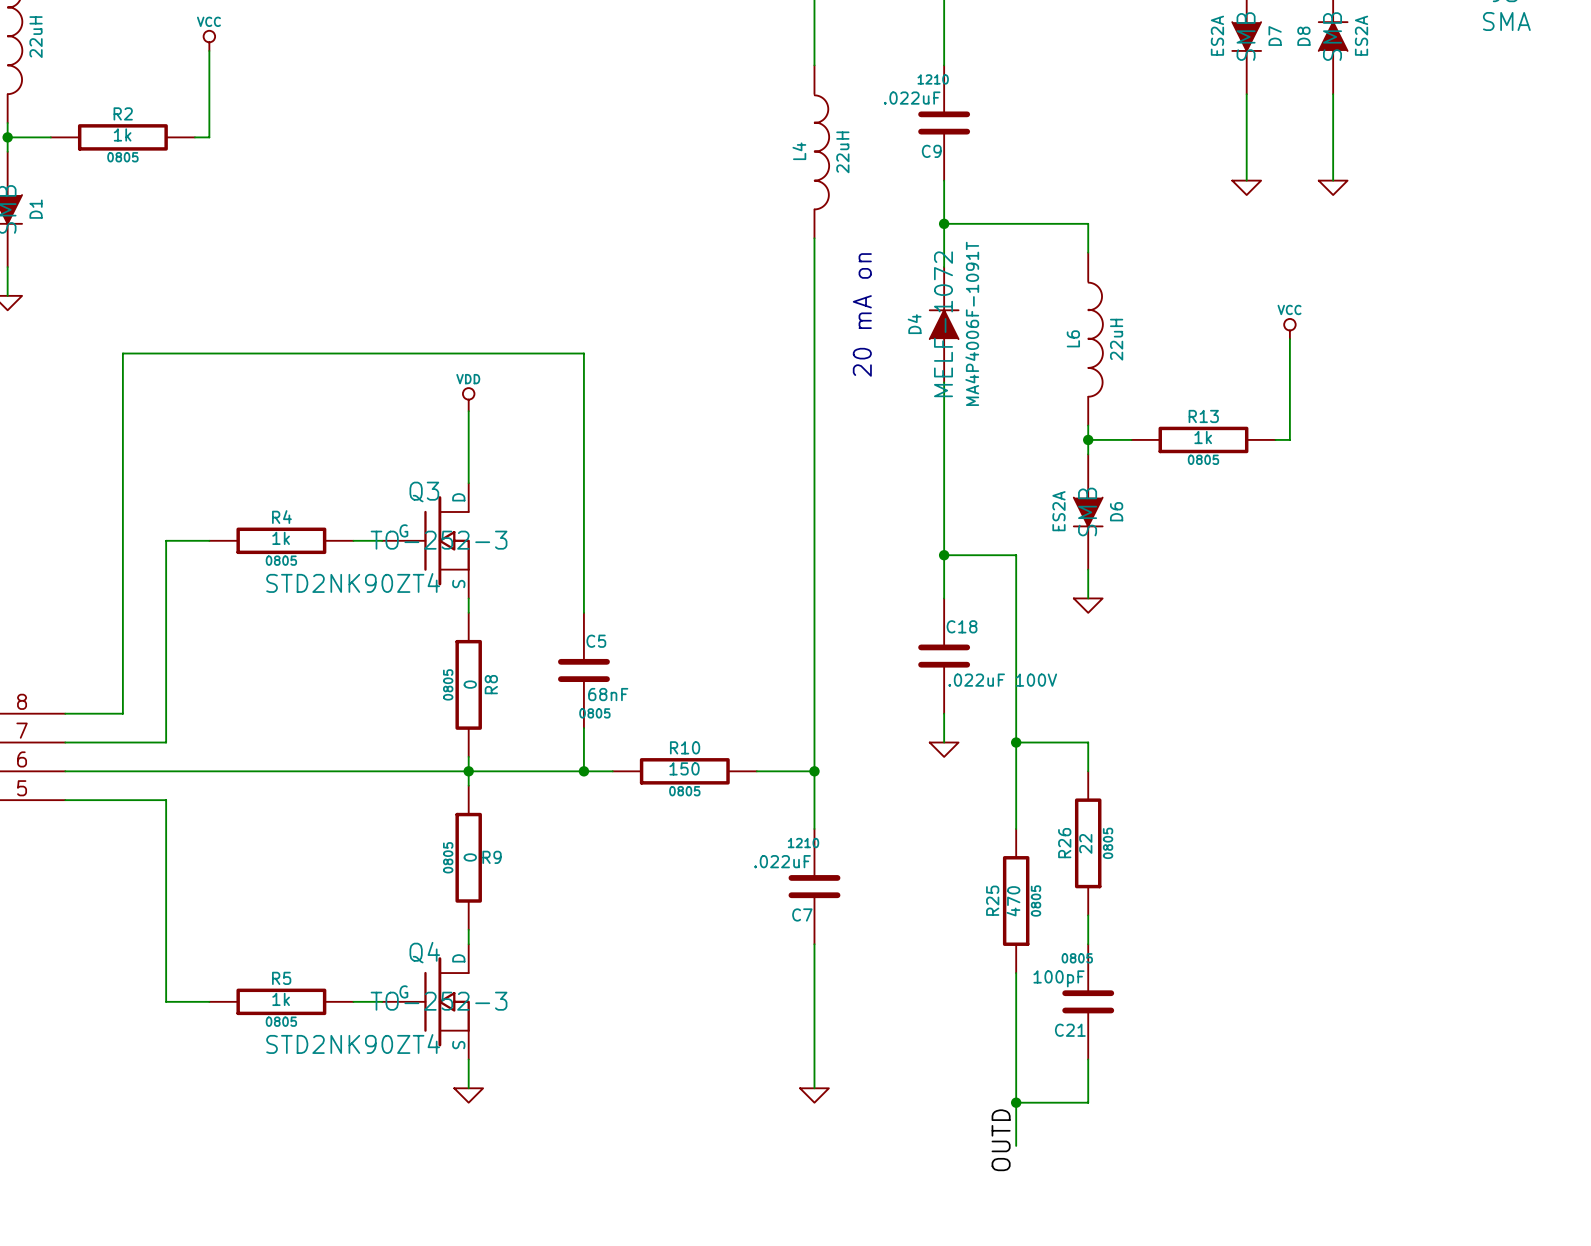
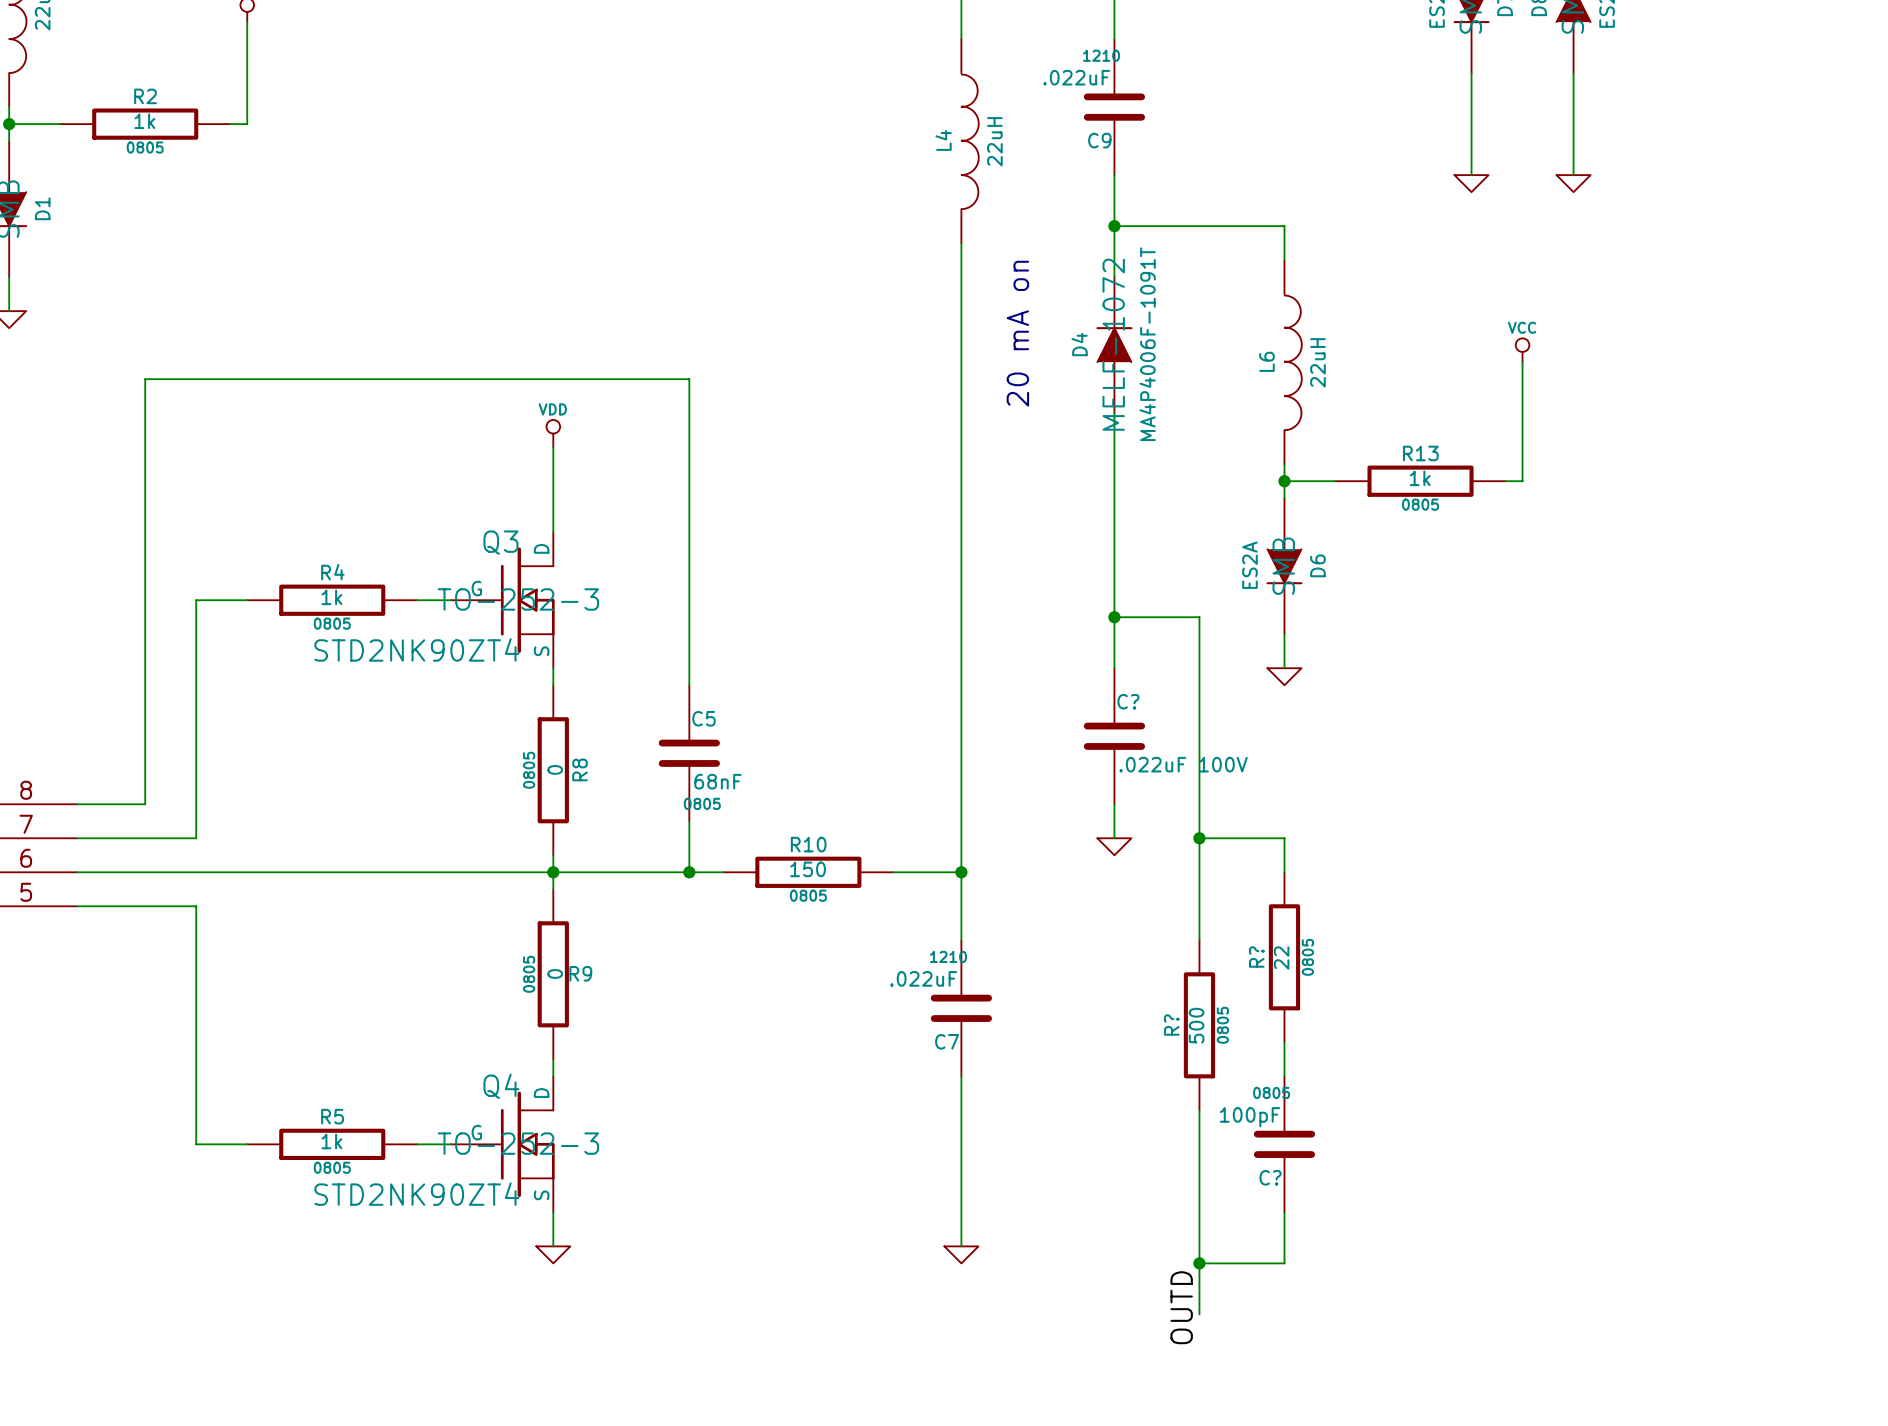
C18 name: C18 (962, 626) -> C? (1128, 701)
R26 name: R26 (1064, 843) -> R? (1256, 956)
R25 name: R25 (992, 900) -> R? (1171, 1025)
R25 value: 470 (1013, 901) -> 500 (1196, 1025)
C21 name: C21 (1070, 1030) -> C? (1270, 1177)

